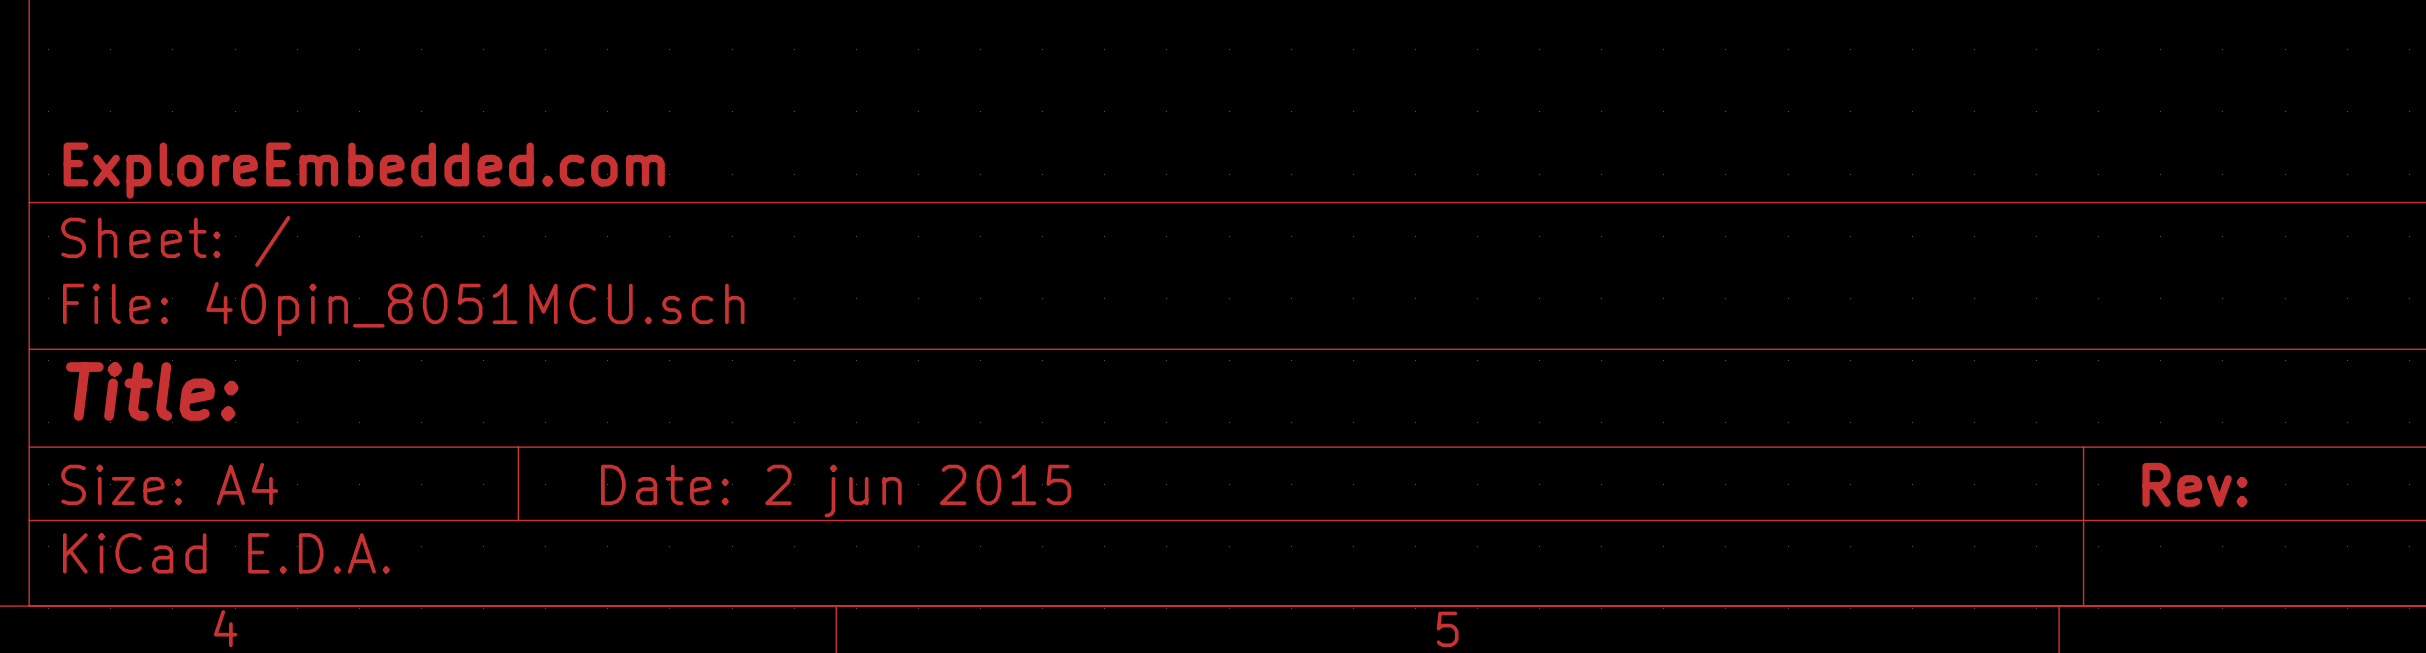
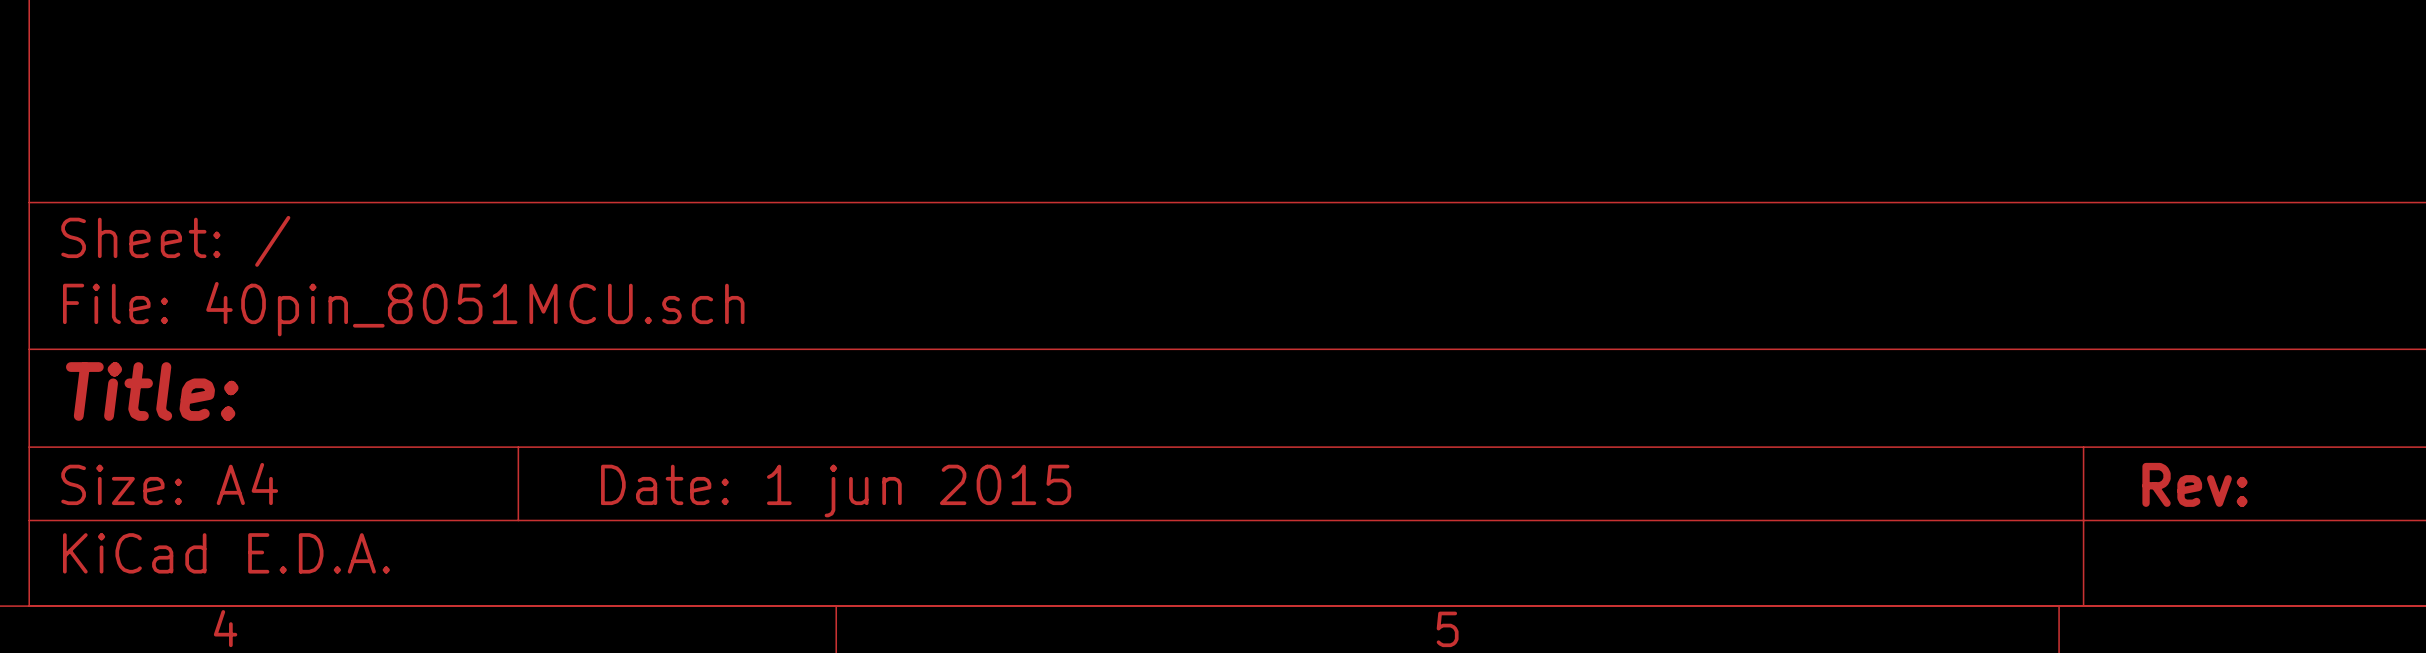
title block: ExploreEmbedded.com (364, 170) -> none
title block: Date: 2 jun 2015 (836, 491) -> Date: 1 jun 2015 (836, 491)

